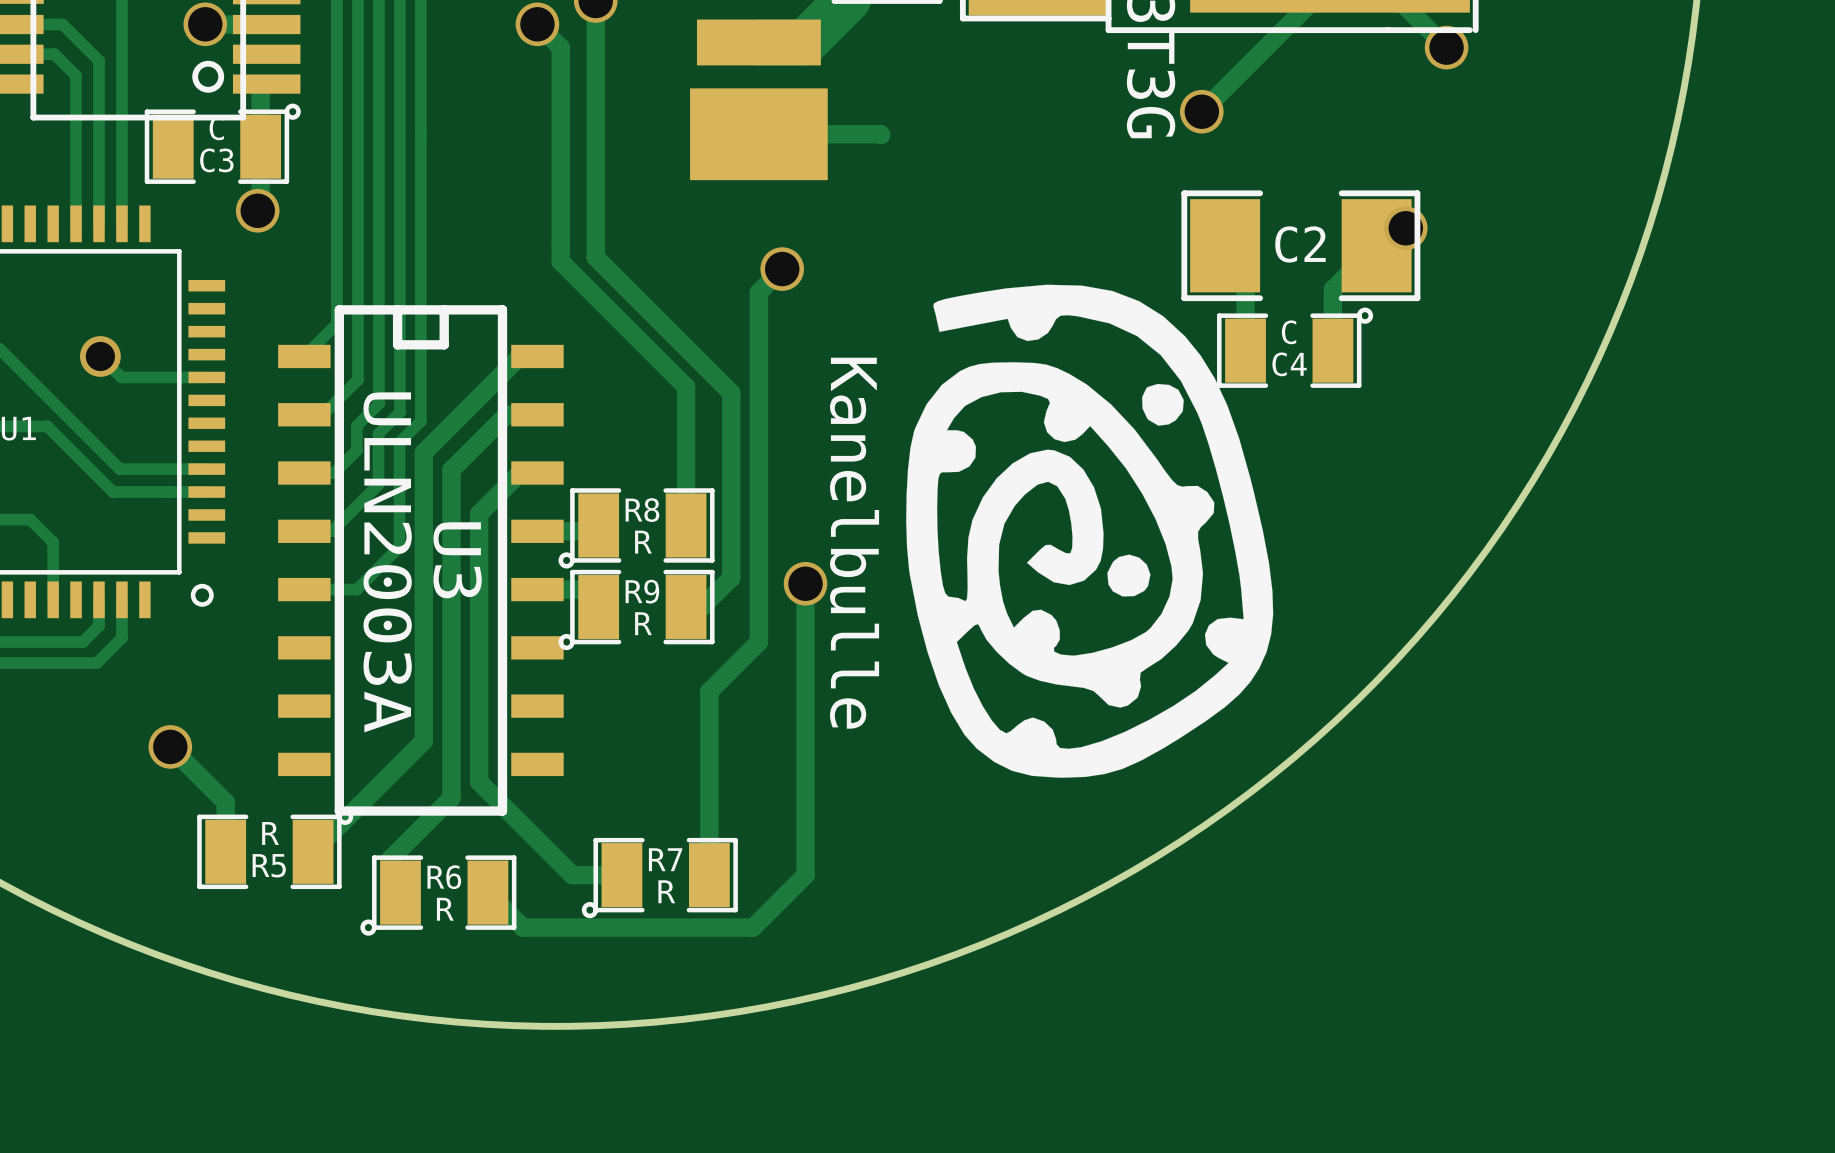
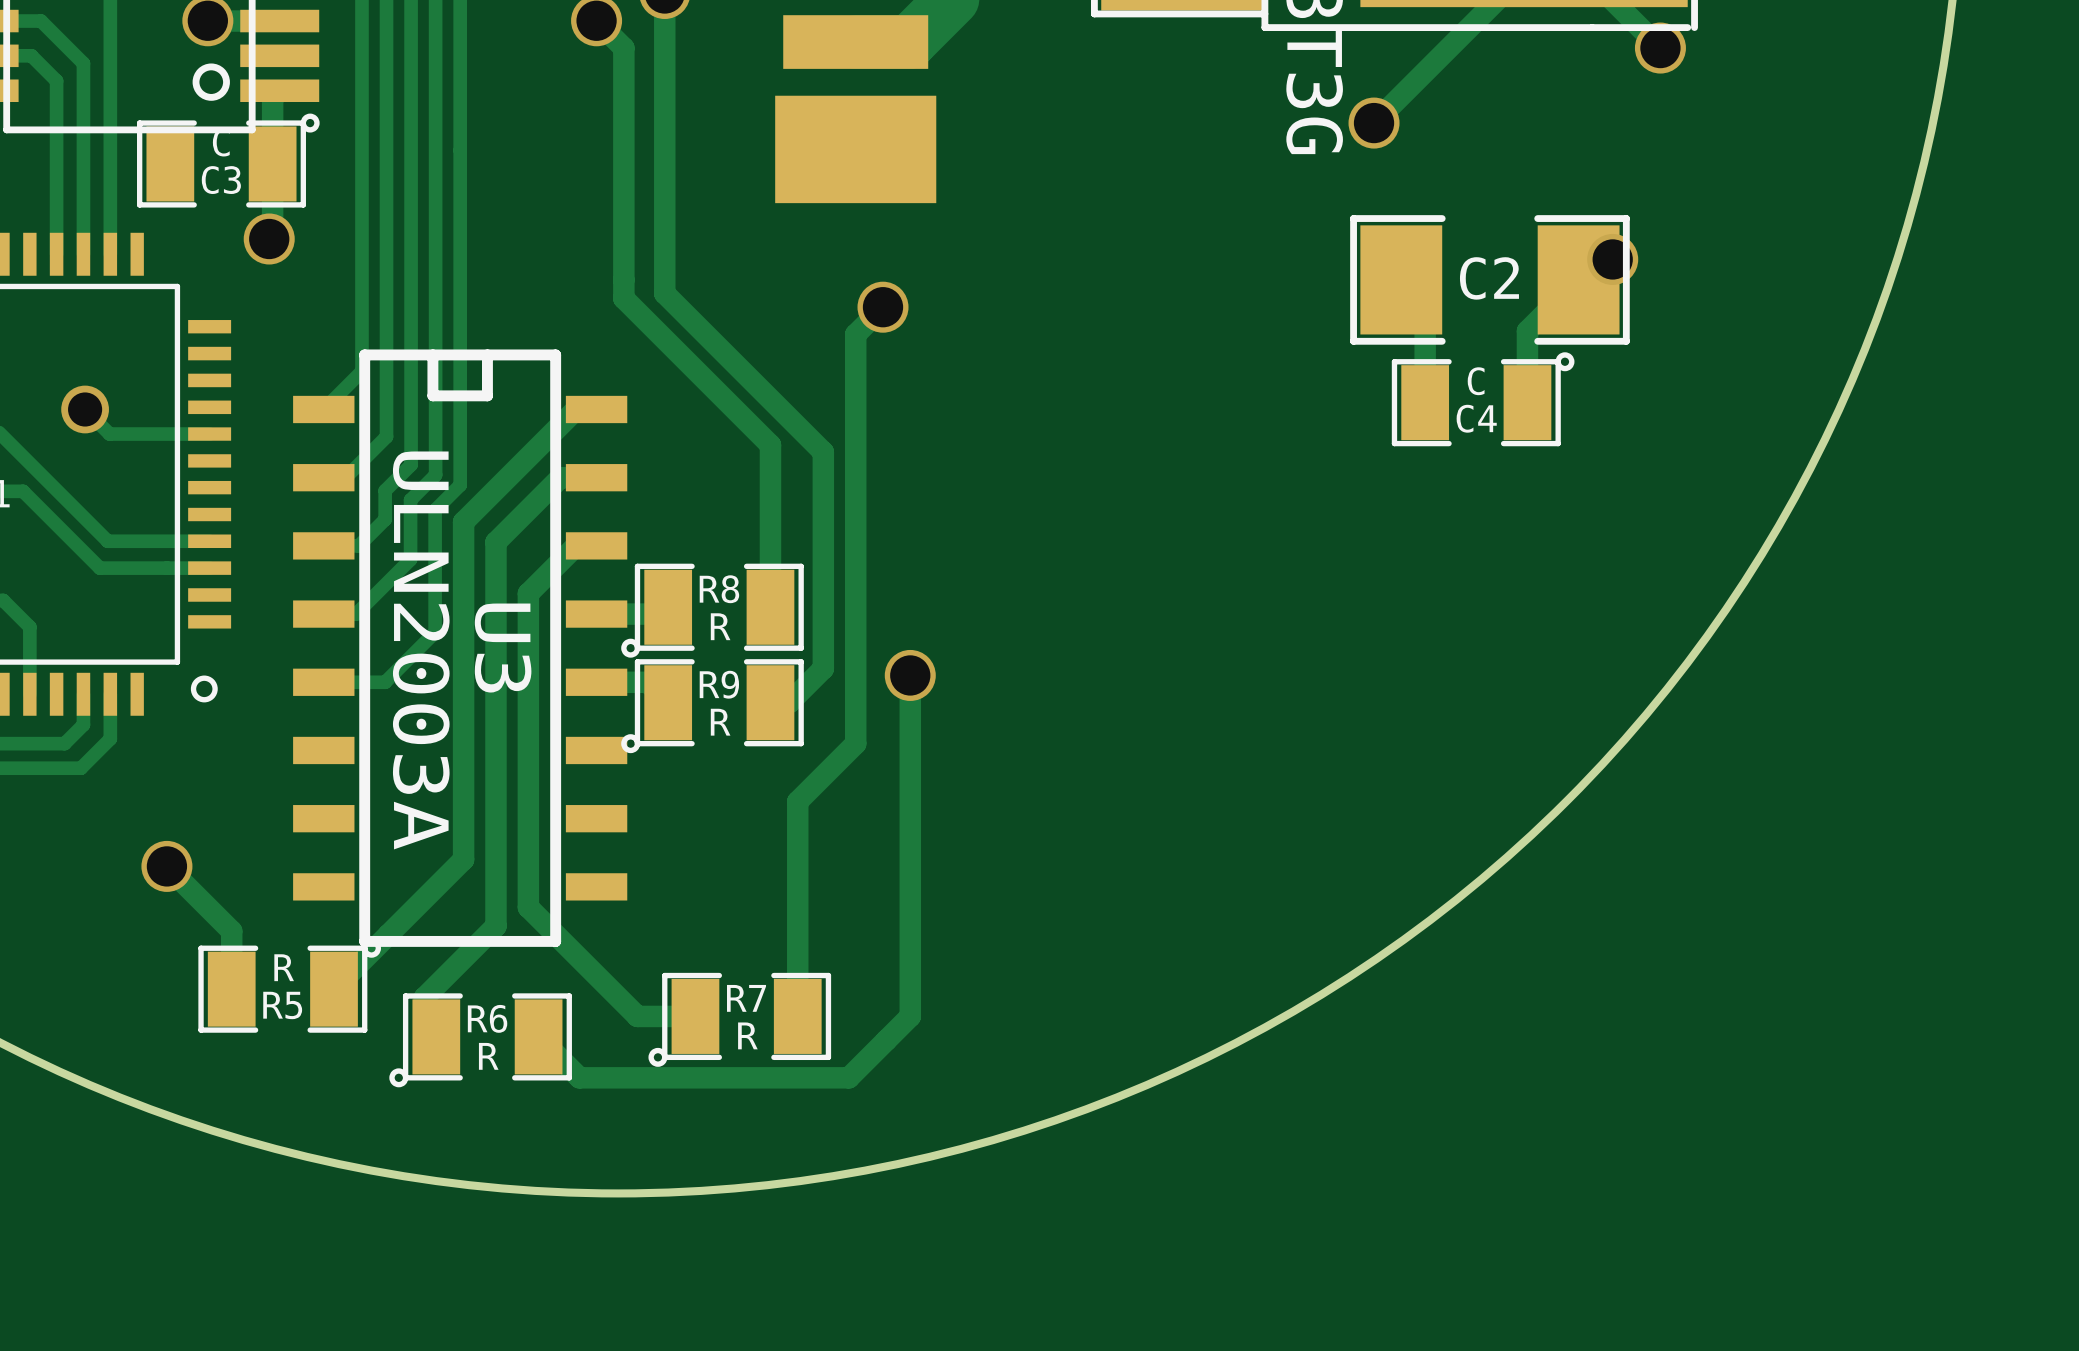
track: (758, 134) (881, 135) -> none
drawing: [906, 284, 1274, 778] -> none
text: Kanelbulle (854, 543) -> none

